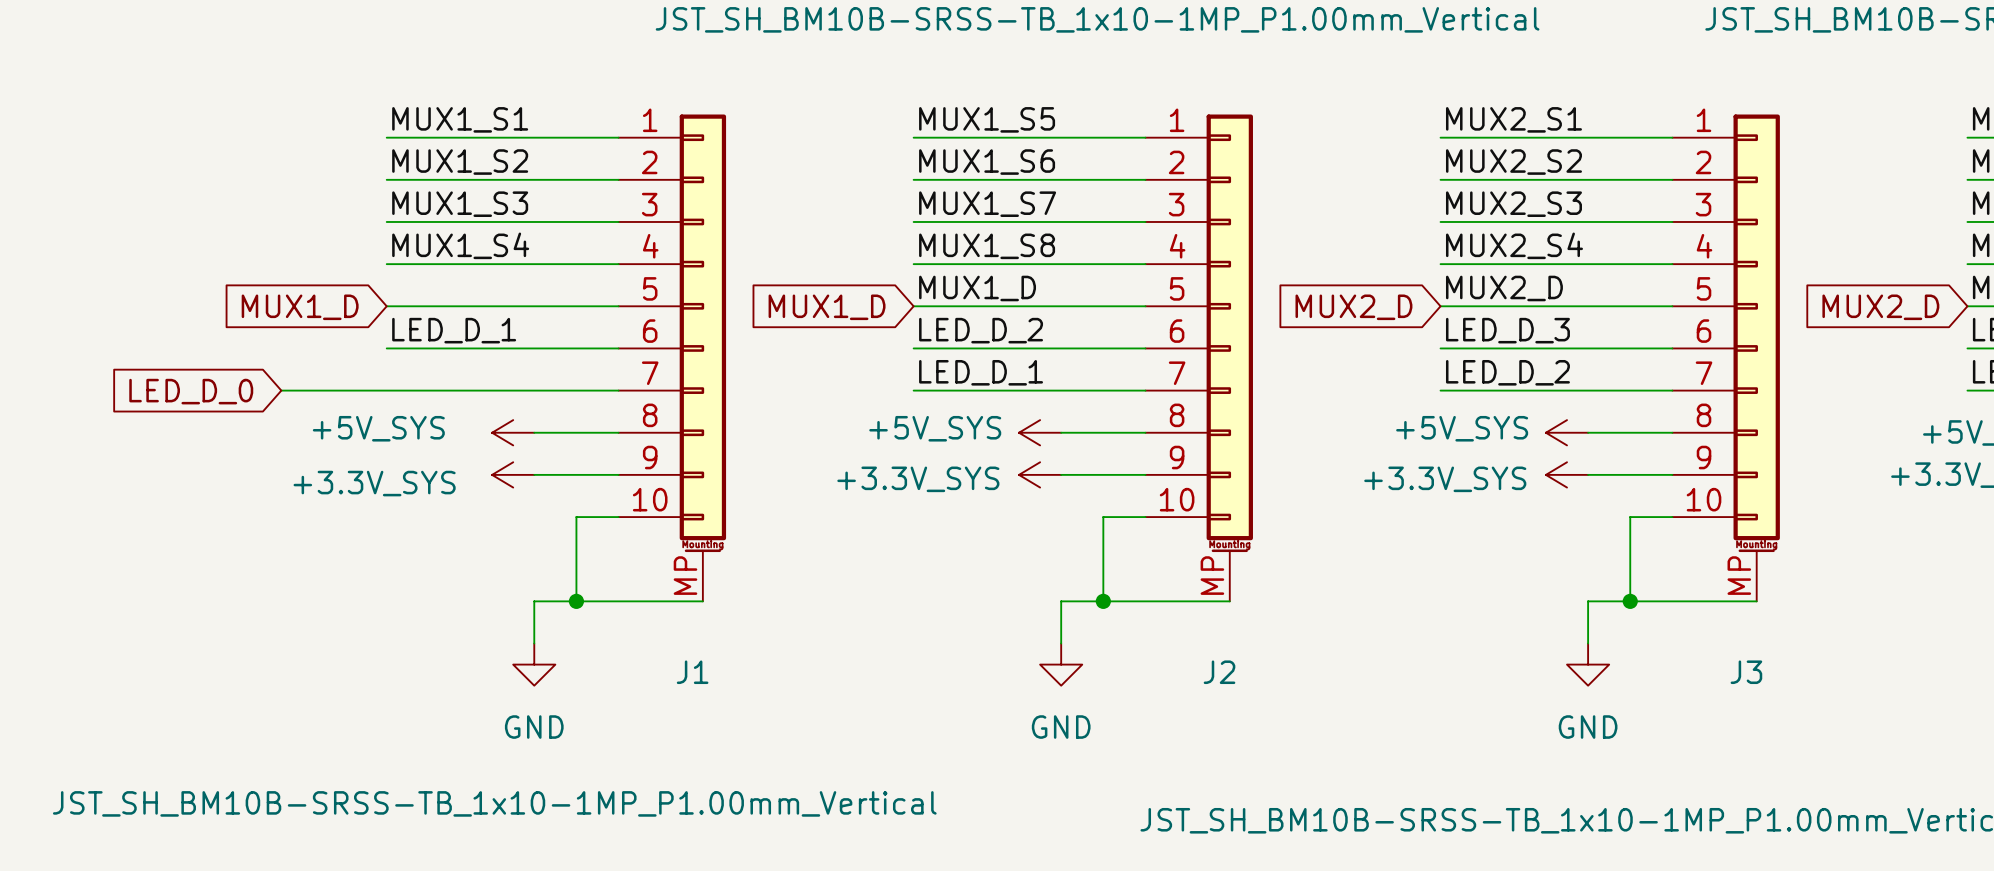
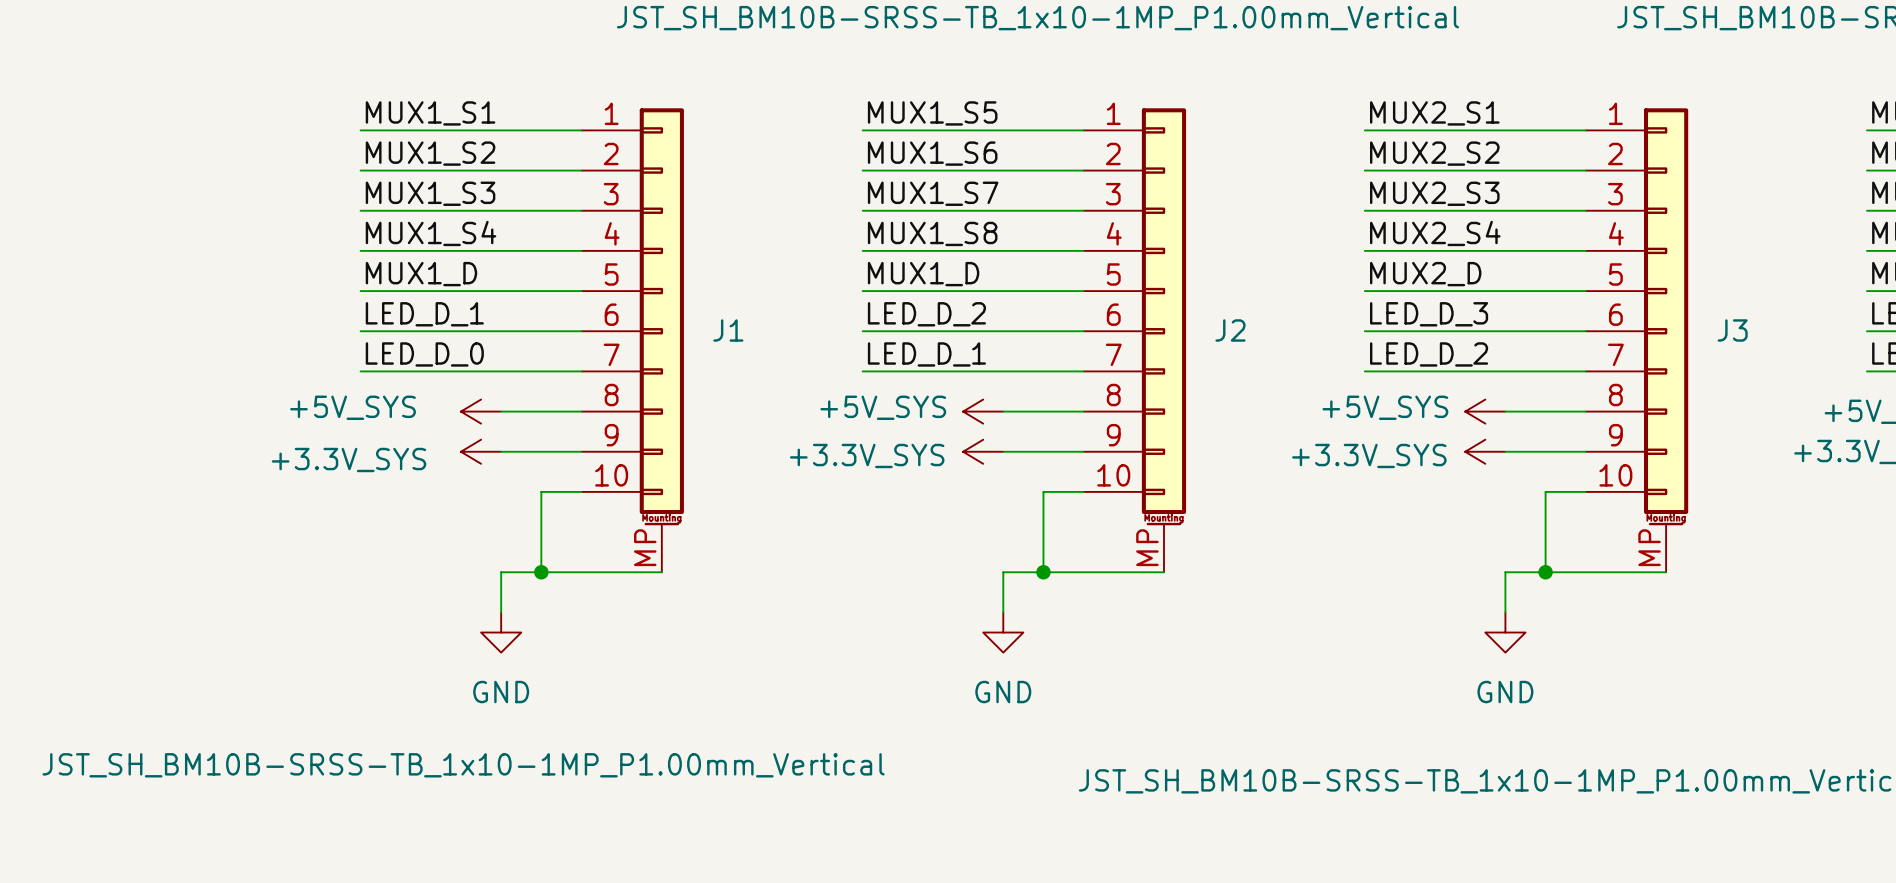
label: none -> MUX1_D (421, 274)
global label: MUX1_D (300, 307) -> none
global label: MUX1_D (827, 307) -> none
global label: MUX2_D (1353, 307) -> none
global label: MUX2_D (1880, 307) -> none
label: none -> LED_D_0 (424, 354)
wire: (281, 390) (386, 390) -> none
global label: LED_D_0 (191, 391) -> none
J1 name position: J1 (692, 672) -> J1 (728, 330)
J2 name position: J2 (1219, 672) -> J2 (1230, 330)
J3 name position: J3 (1746, 672) -> J3 (1732, 330)

